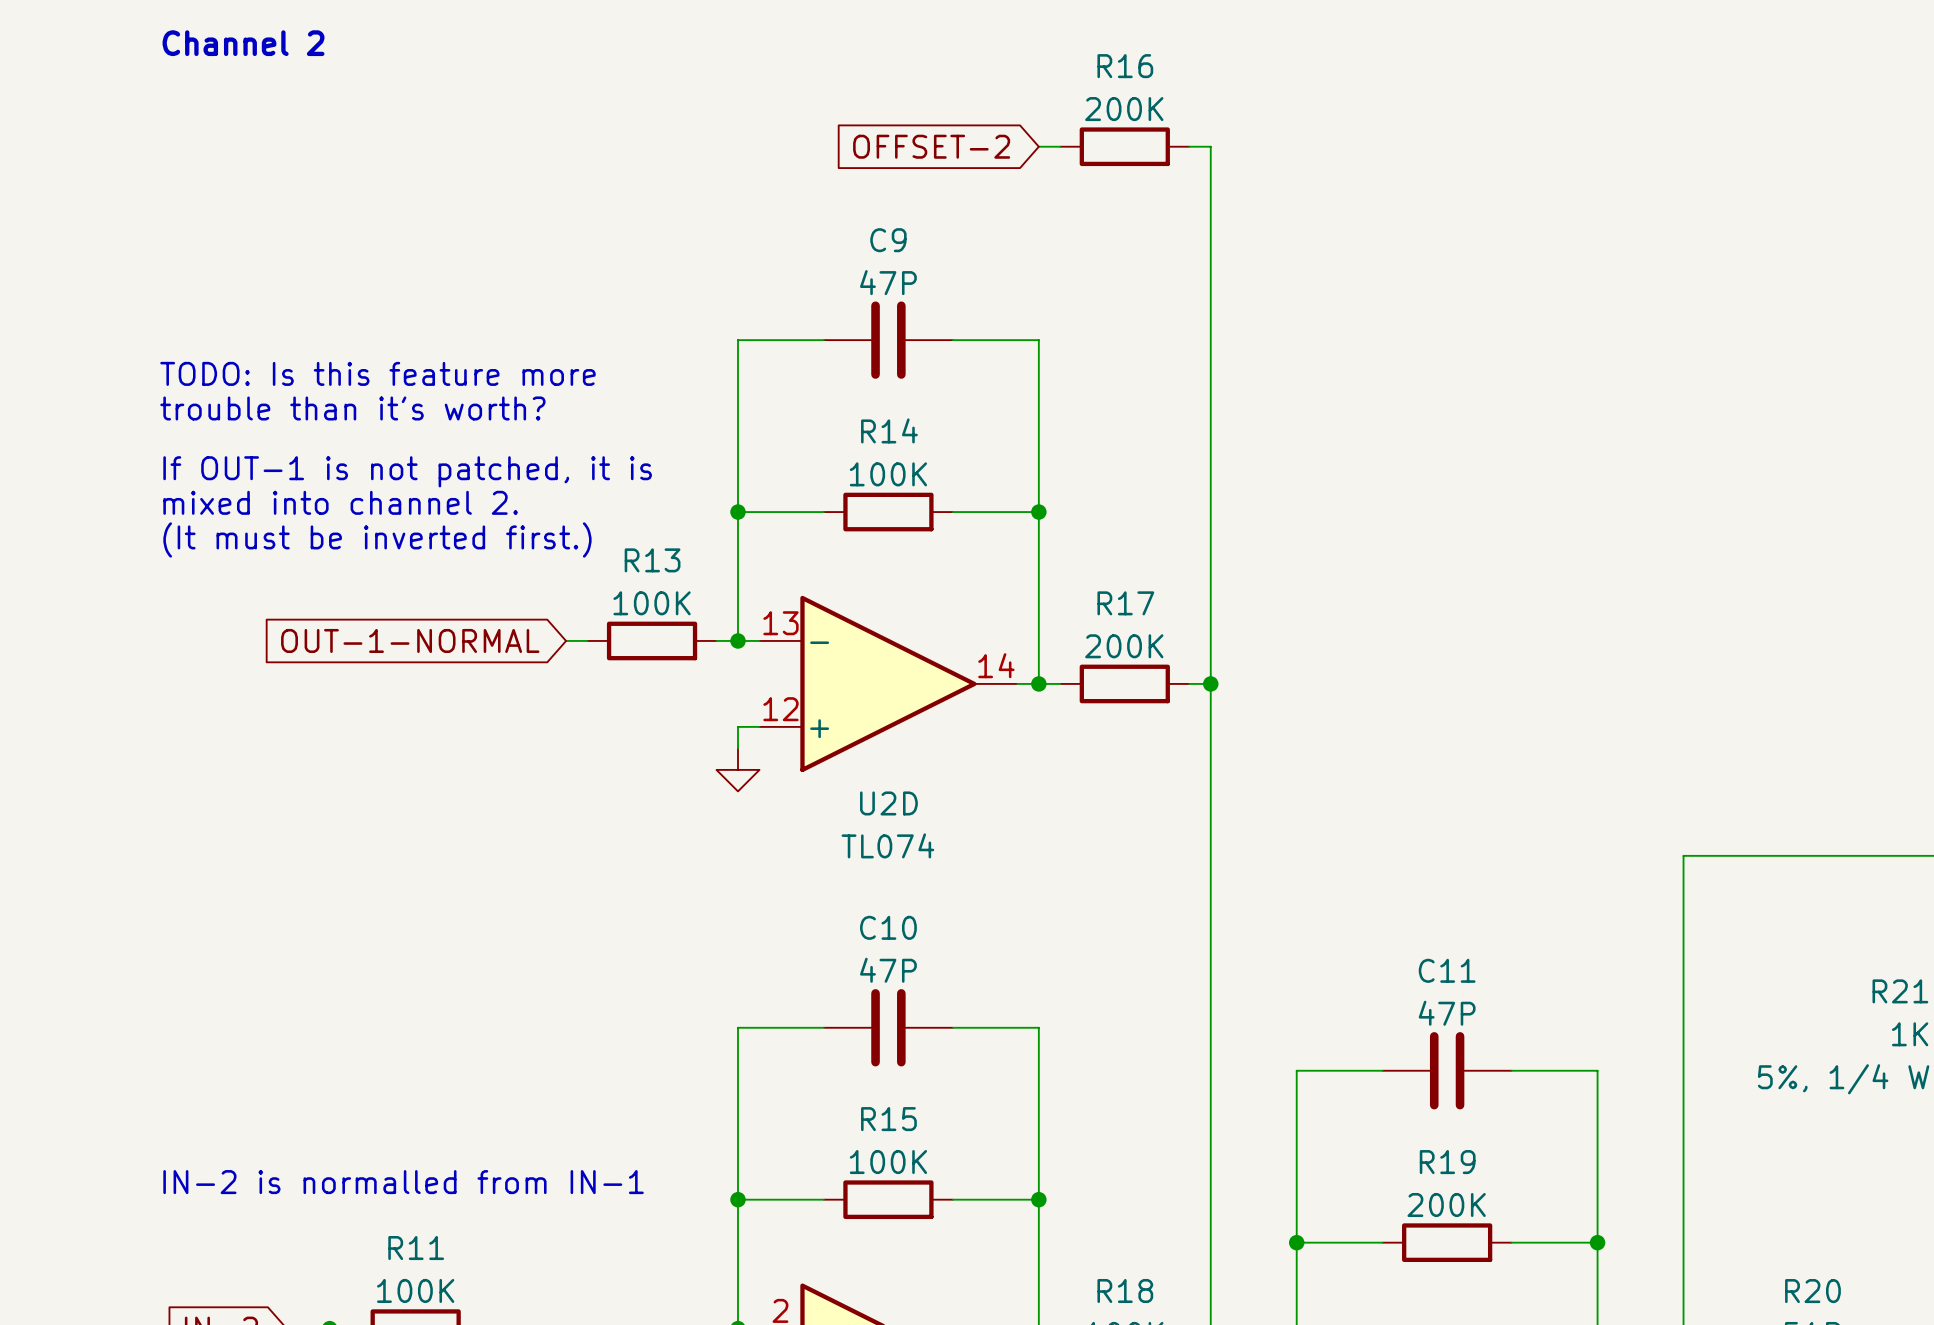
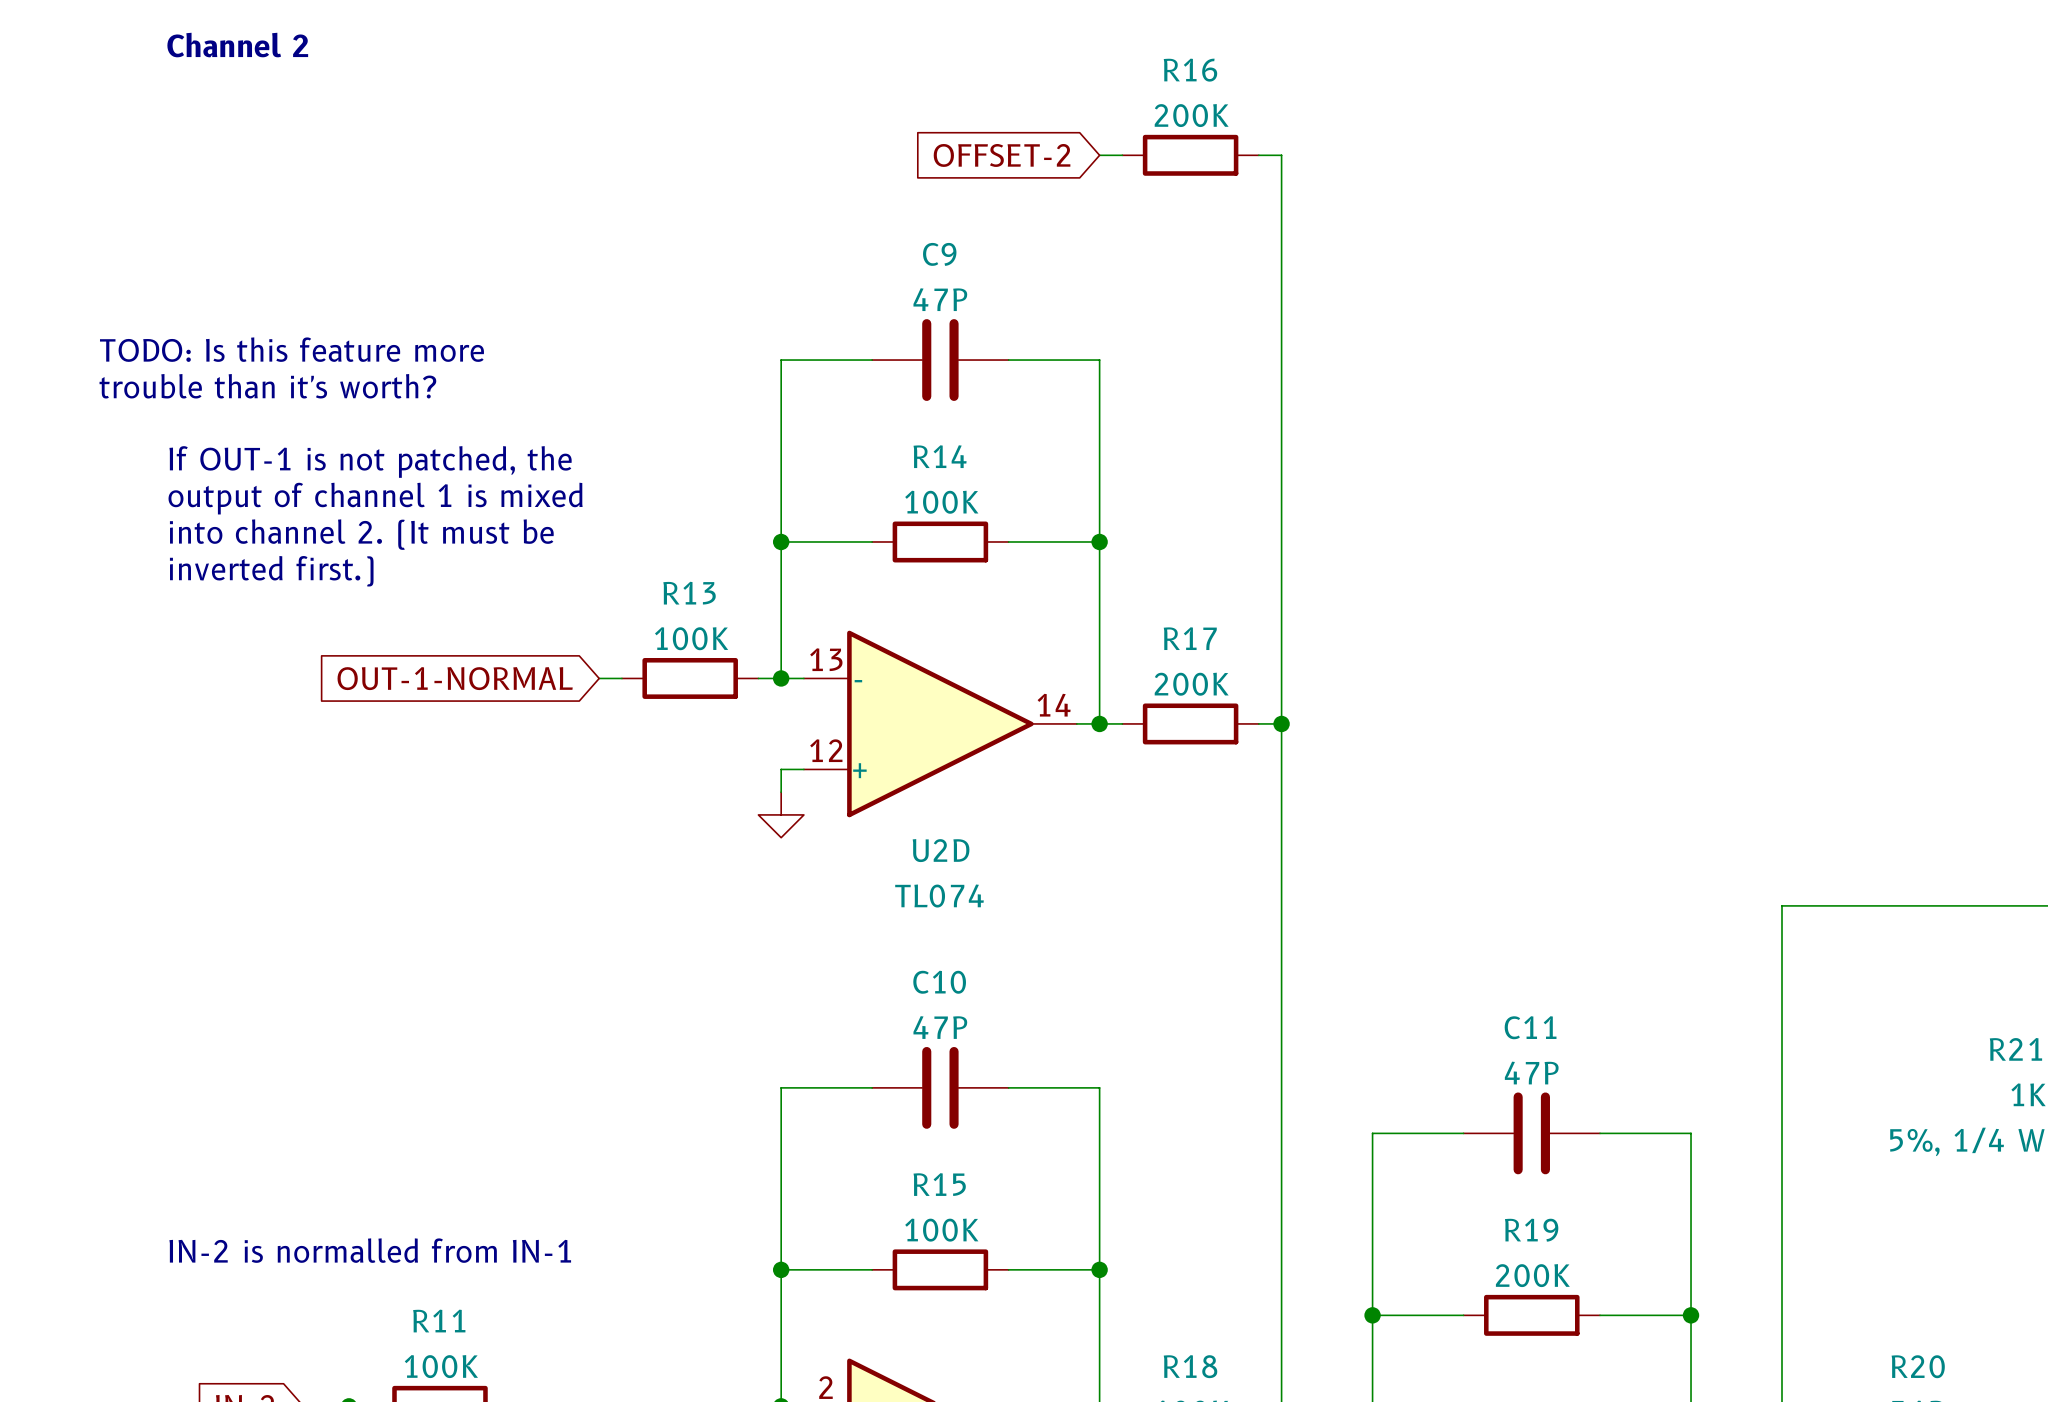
text position: TODO: Is this feature more (377, 373) -> TODO: Is this feature more (291, 349)
text position: trouble than it's worth? (352, 408) -> trouble than it's worth? (267, 386)
text: none -> If OUT-1 is not patched, the (370, 461)
text: If OUT-1 is not patched, it is (407, 471) -> output of channel 1 is mixed (375, 498)
text: mixed into channel 2. (340, 502) -> into channel 2. (It must be (361, 534)
text: (It must be inverted first.) (377, 539) -> inverted first.) (271, 571)

